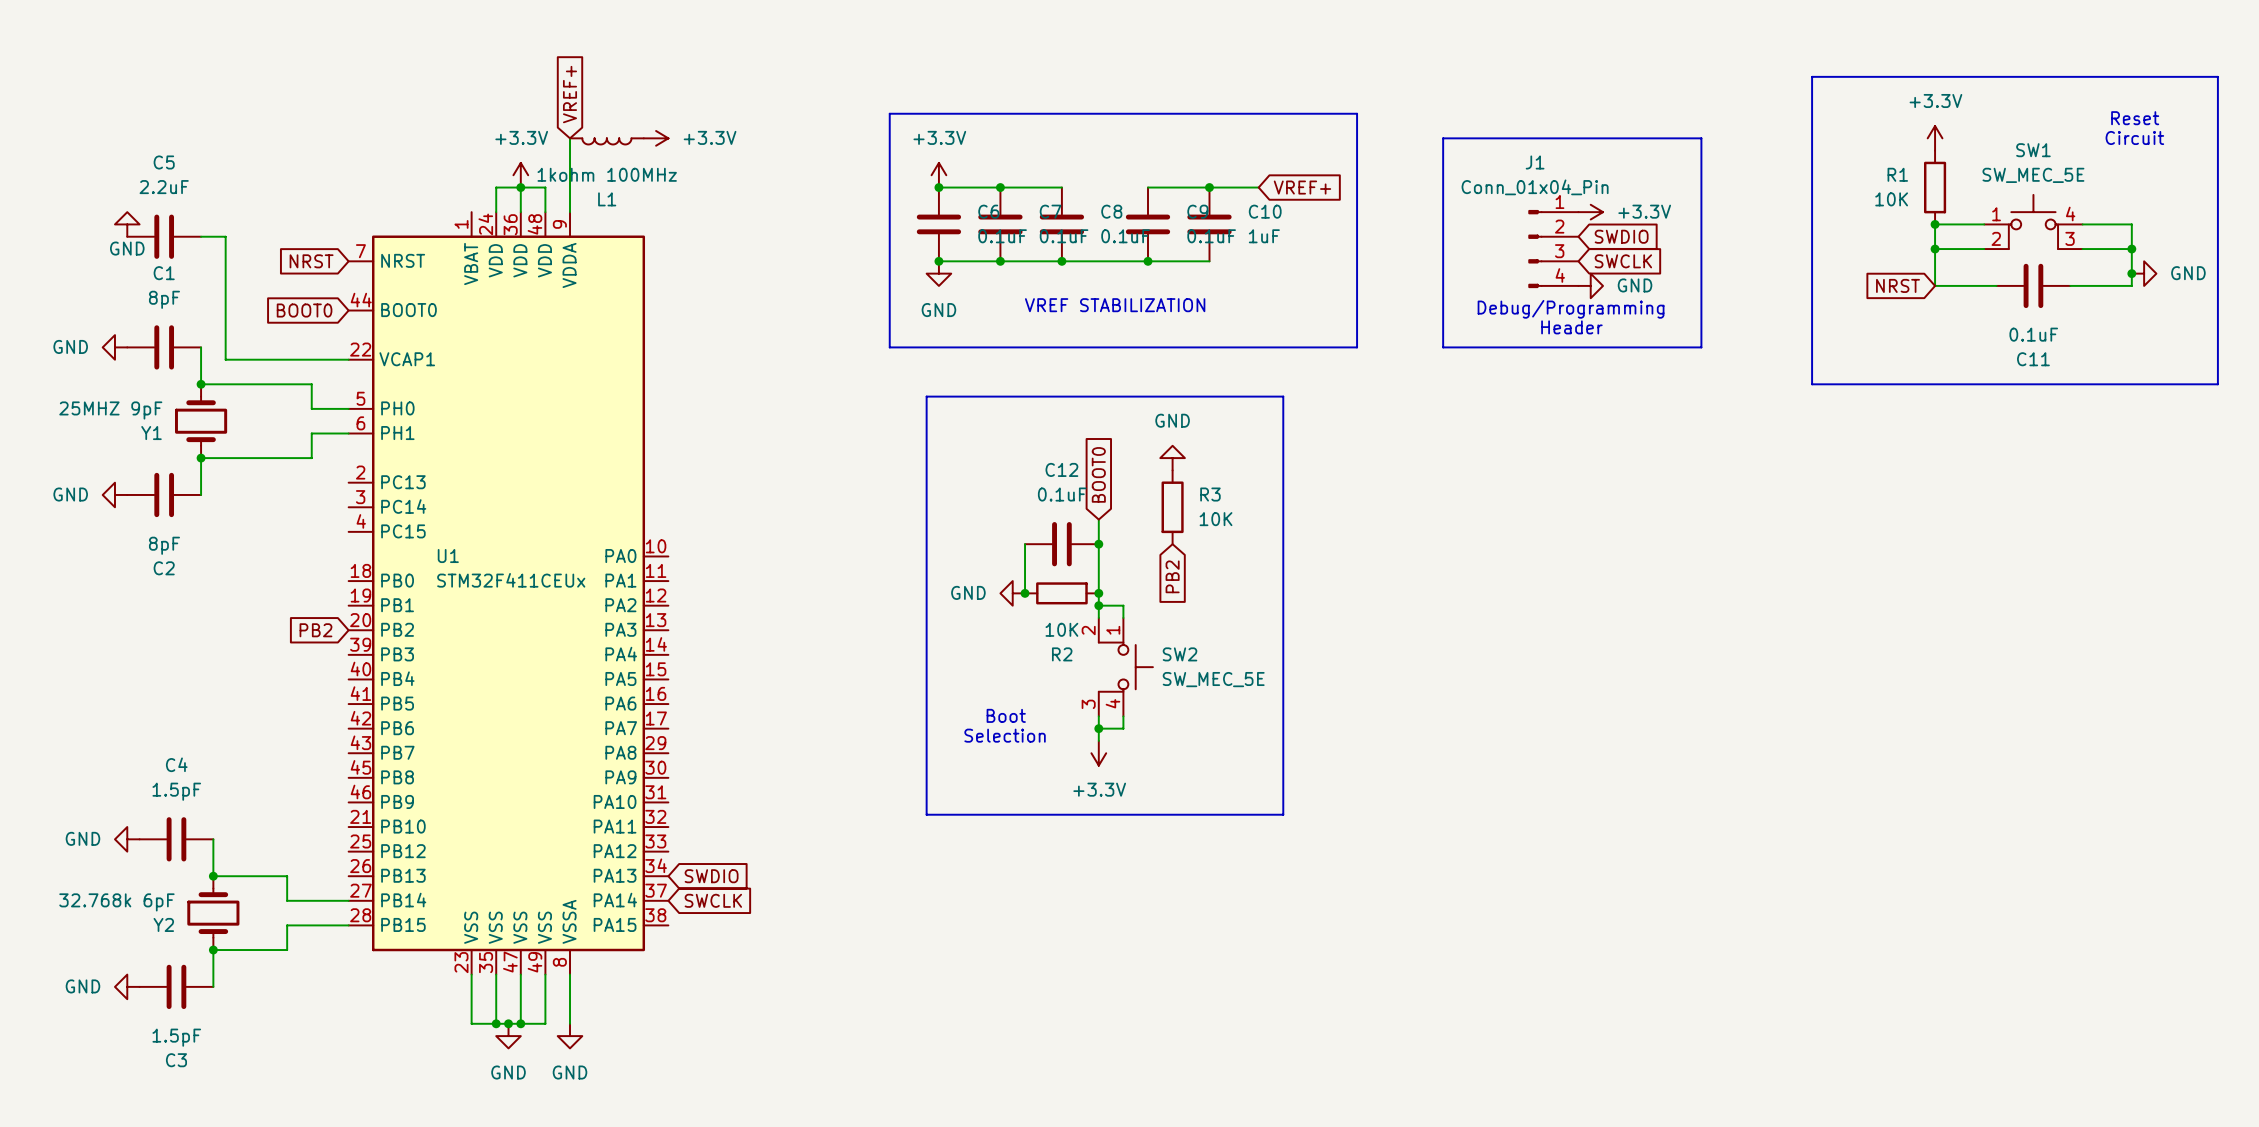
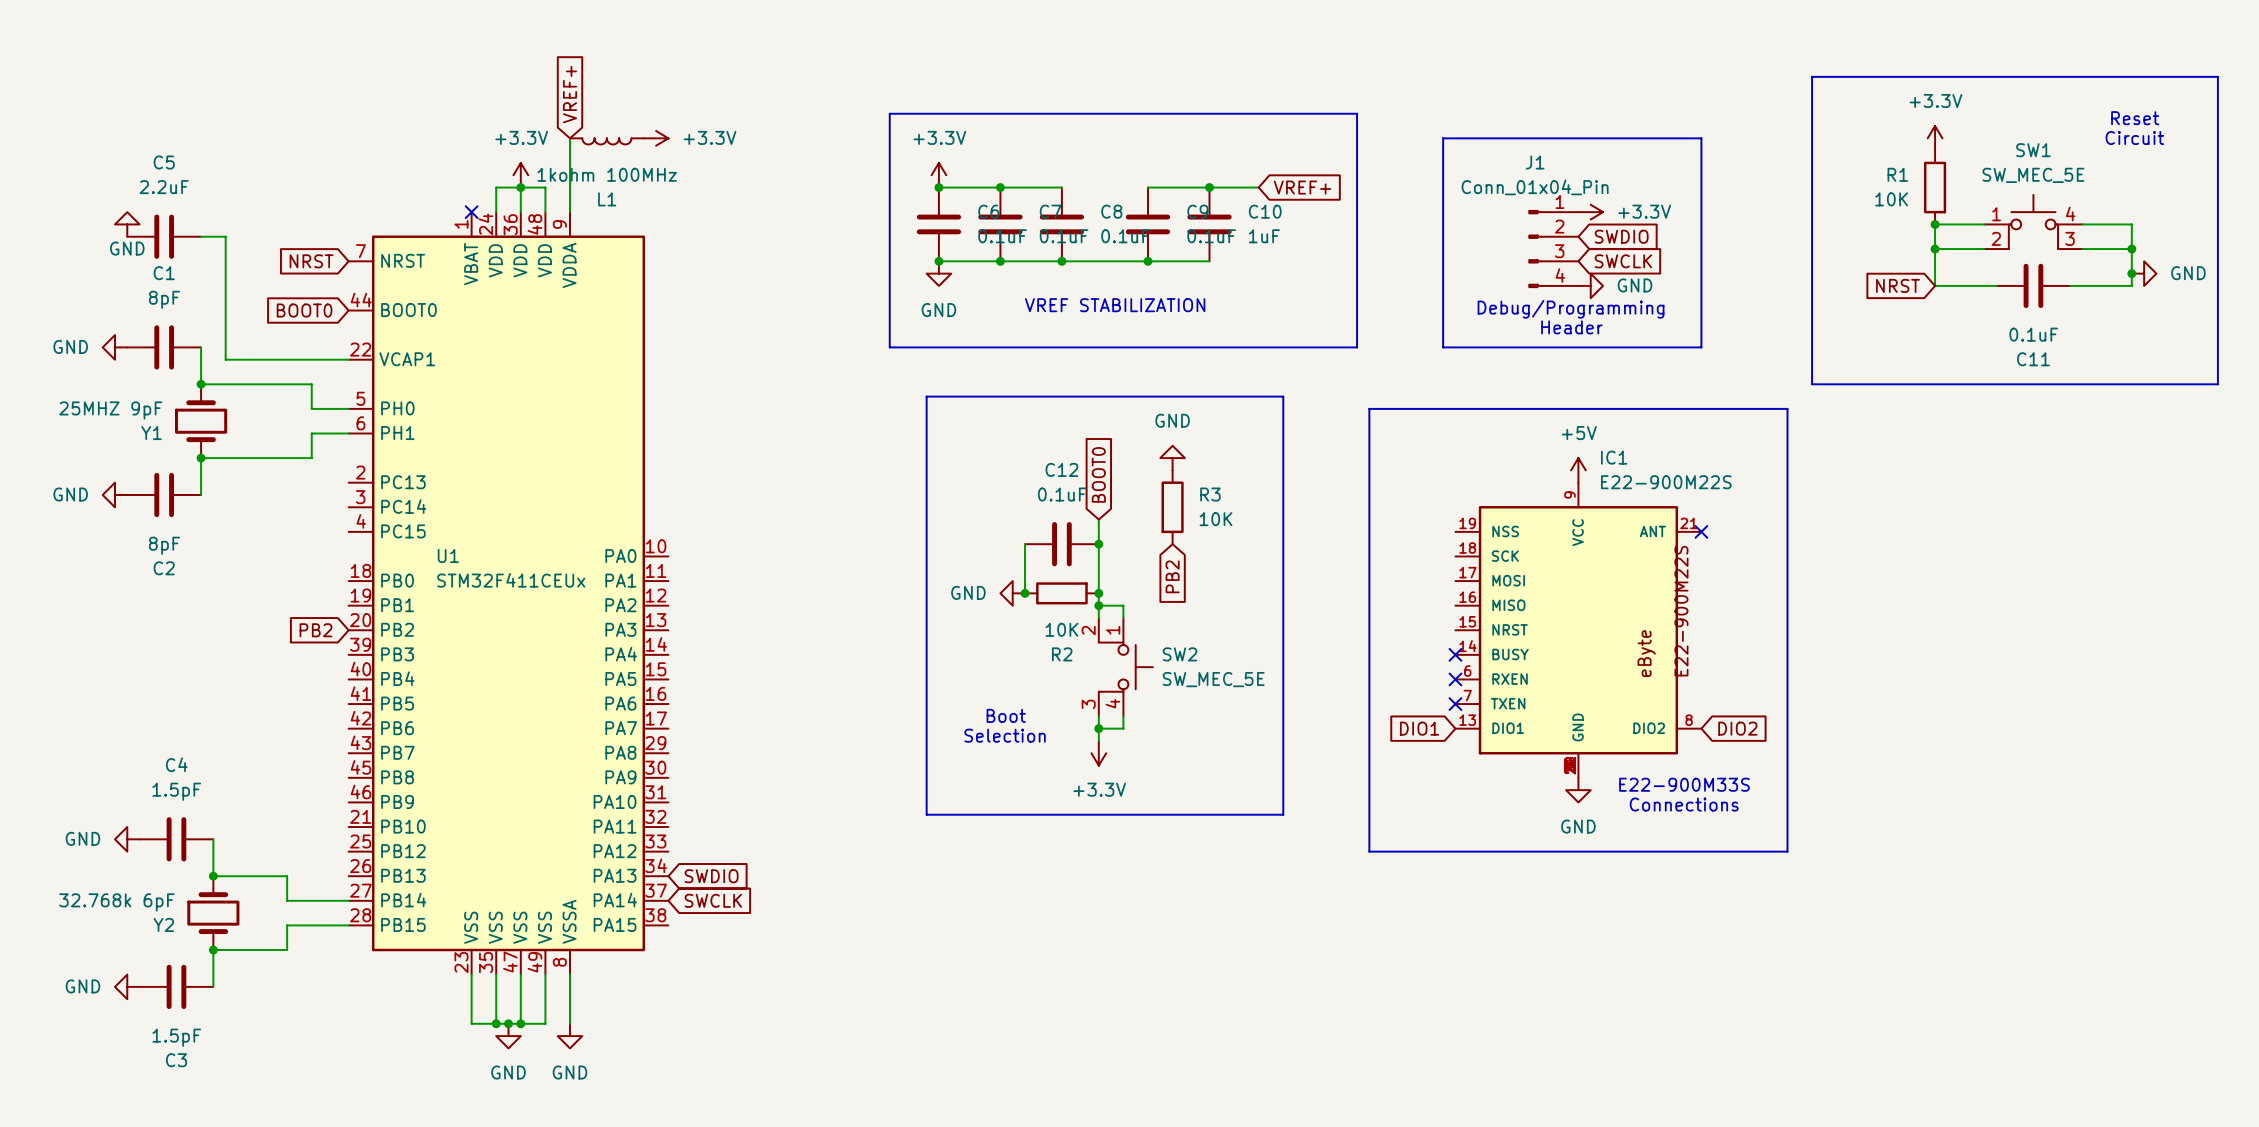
no-connect mark: none -> (471, 212)
line: none -> (1369, 408) (1787, 408) (1787, 851) (1369, 851) (1369, 408)
power symbol: none -> +5V (1578, 470)
no-connect mark: none -> (1701, 531)
IC1: none -> E22-900M22S (1578, 630)
no-connect mark: none -> (1455, 654)
no-connect mark: none -> (1455, 679)
no-connect mark: none -> (1455, 704)
global label: none -> DIO1 (1419, 728)
global label: none -> DIO2 (1737, 728)
text: none -> E22-900M33S (1684, 784)
power symbol: none -> GND (1578, 790)
text: none -> Connections (1684, 804)

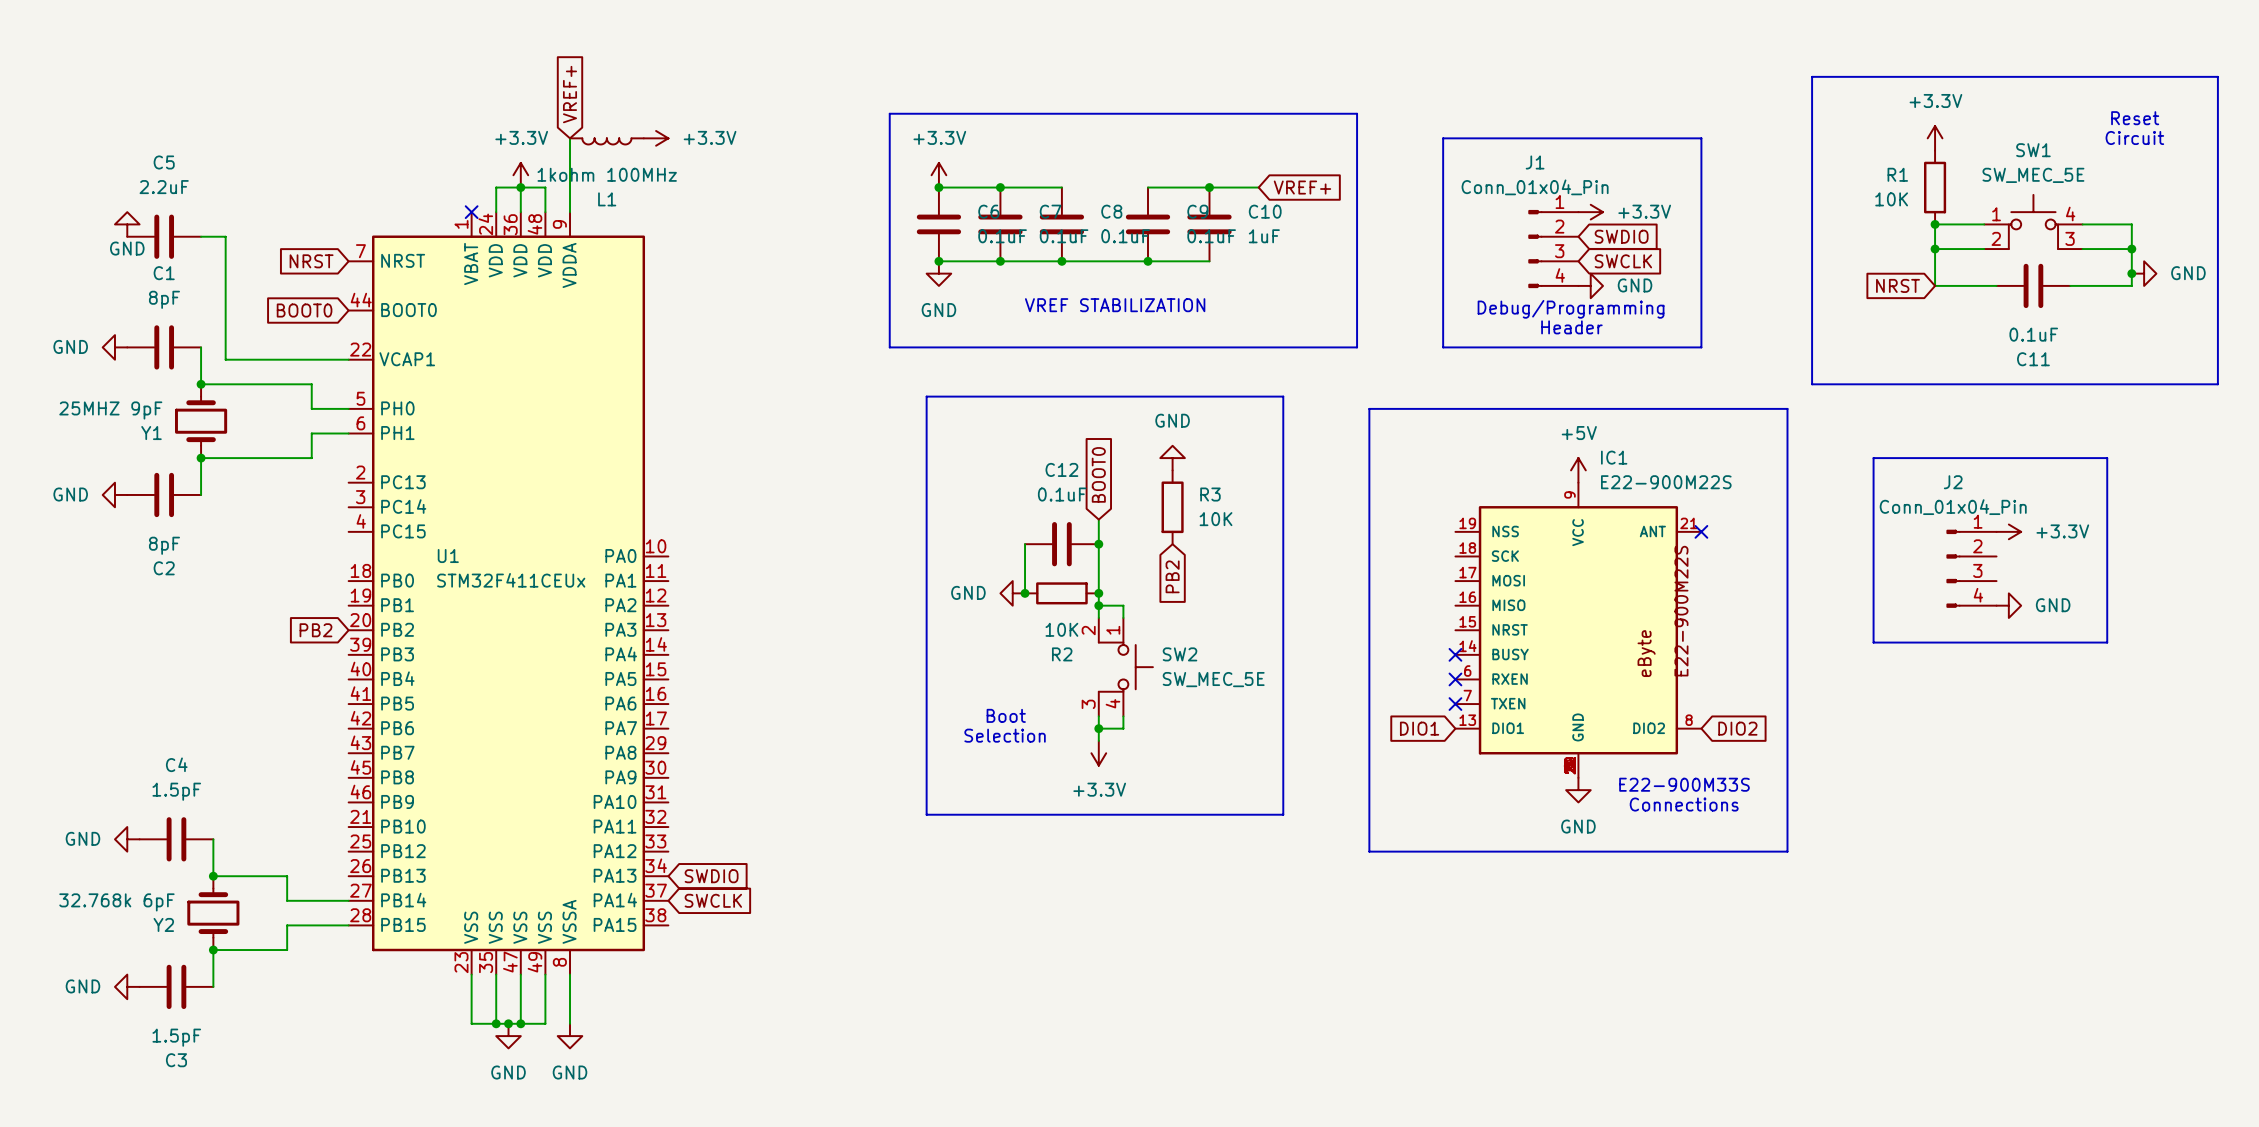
line: none -> (1873, 458) (2107, 458) (2107, 642) (1873, 642) (1873, 458)
power symbol: none -> +3.3V (2008, 531)
J2: none -> Conn_01x04_Pin (1971, 568)
power symbol: none -> GND (2008, 605)

